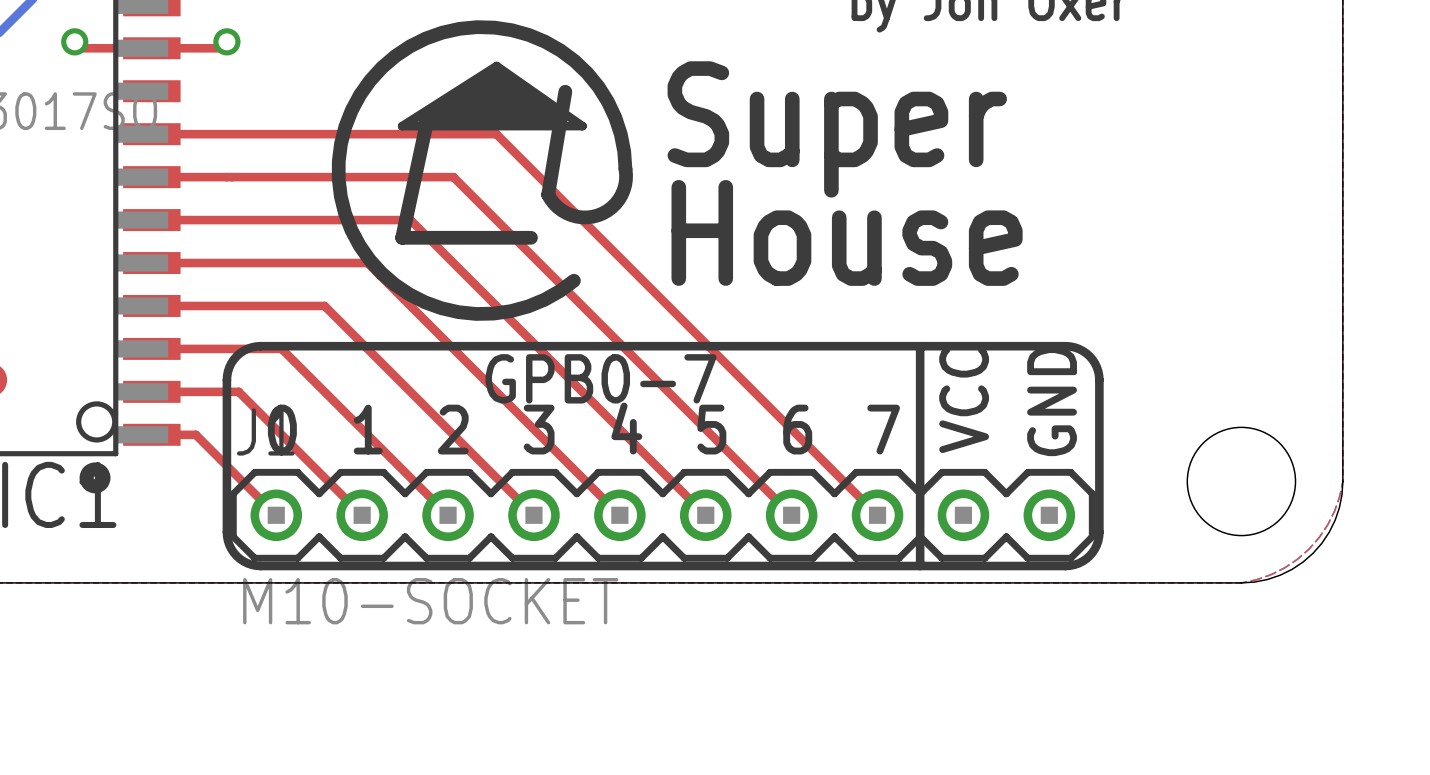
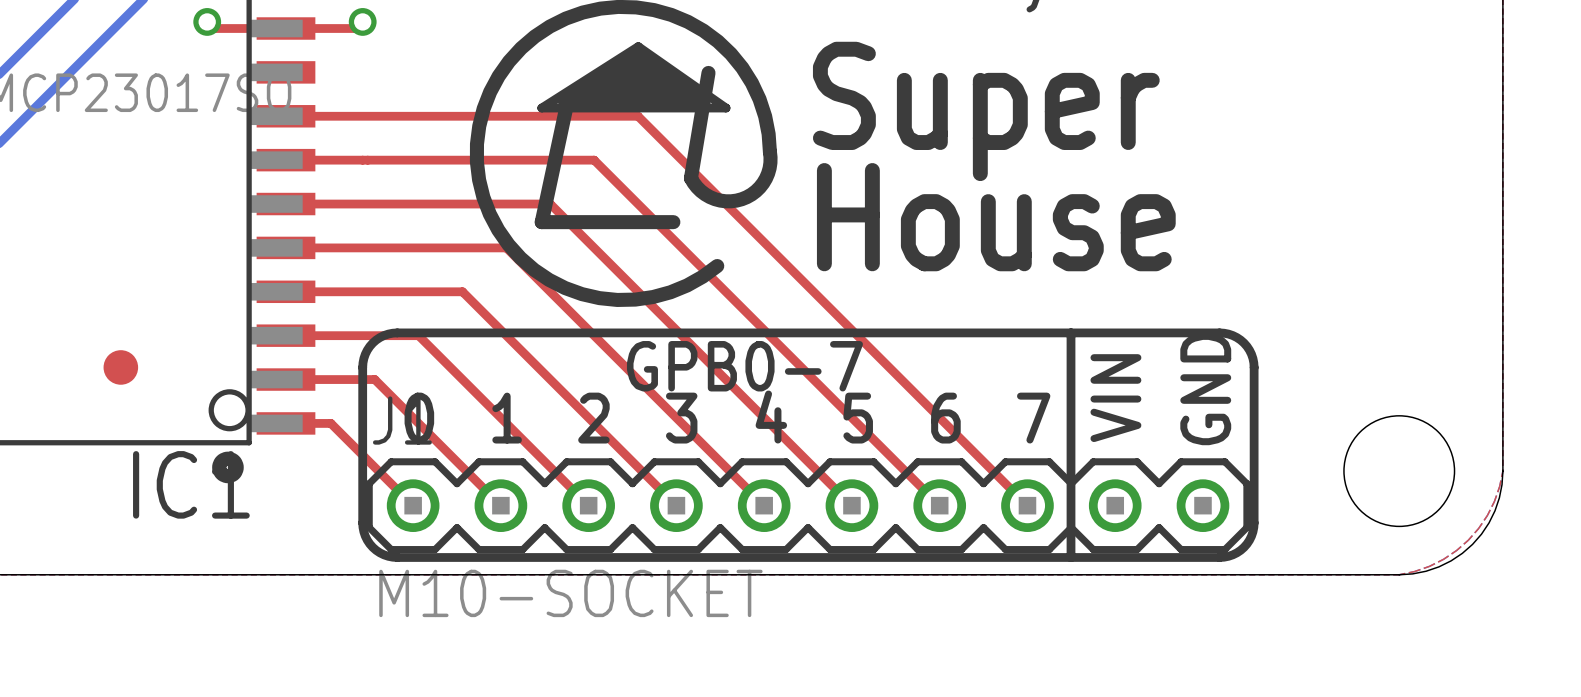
text: VCC (964, 399) -> VIN (1115, 398)

